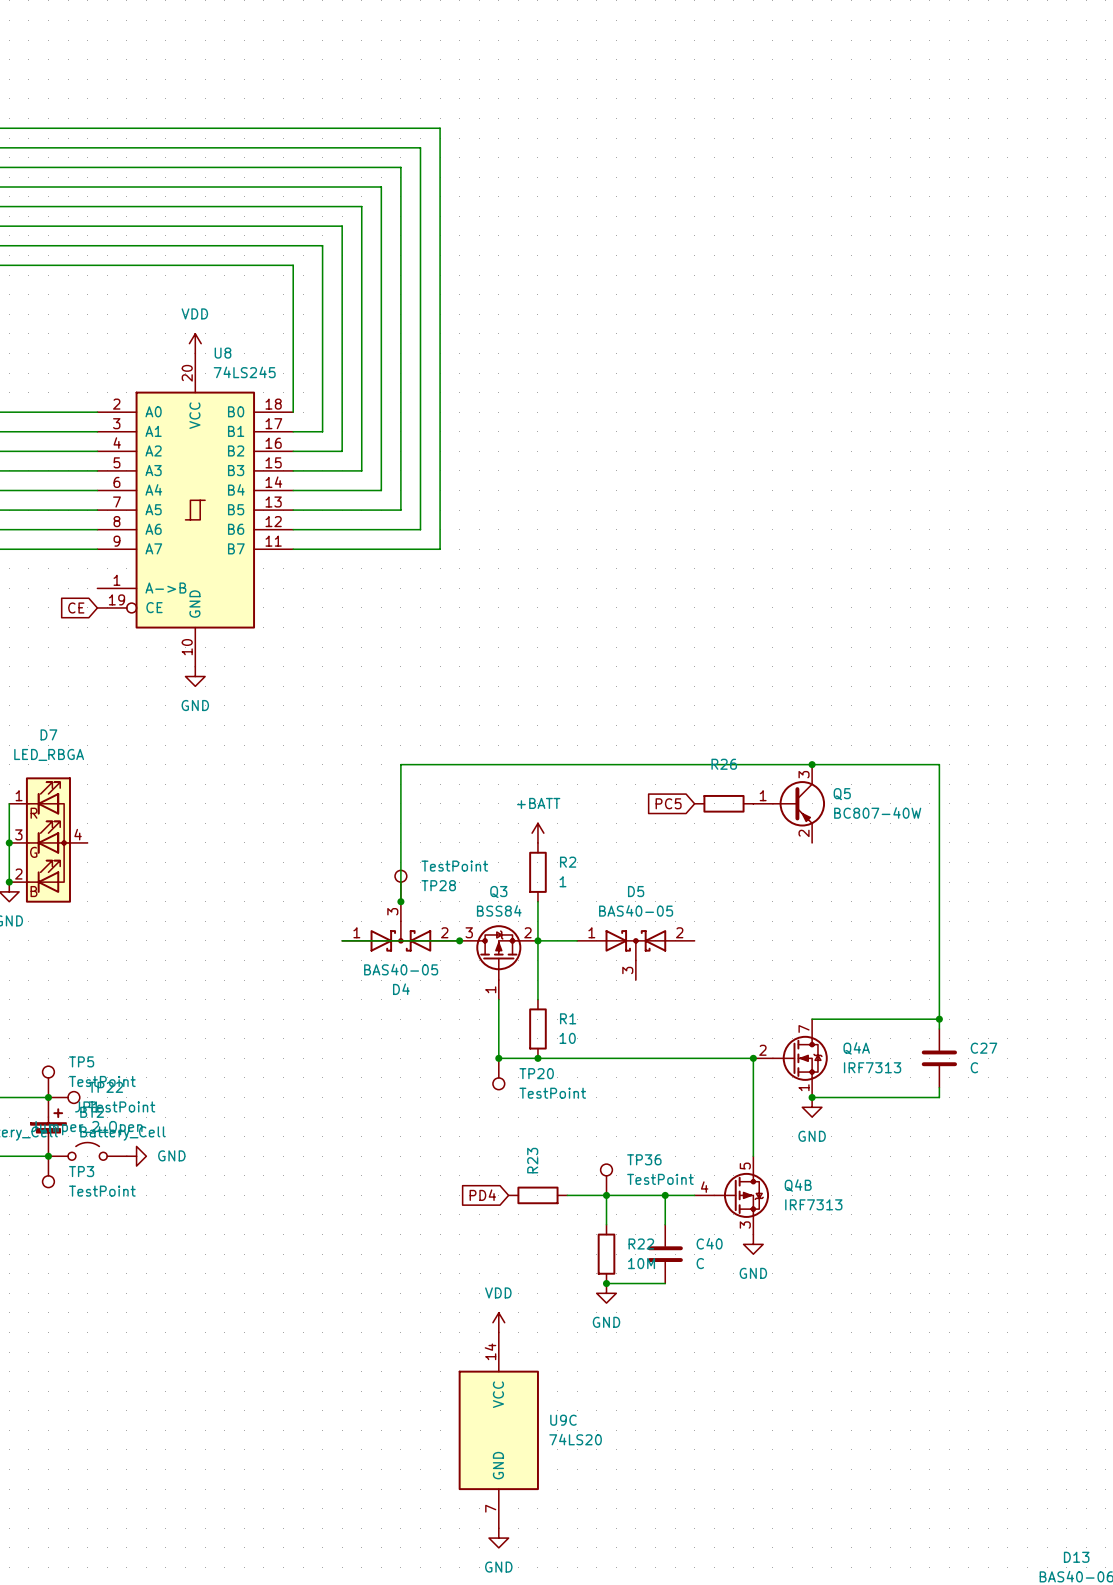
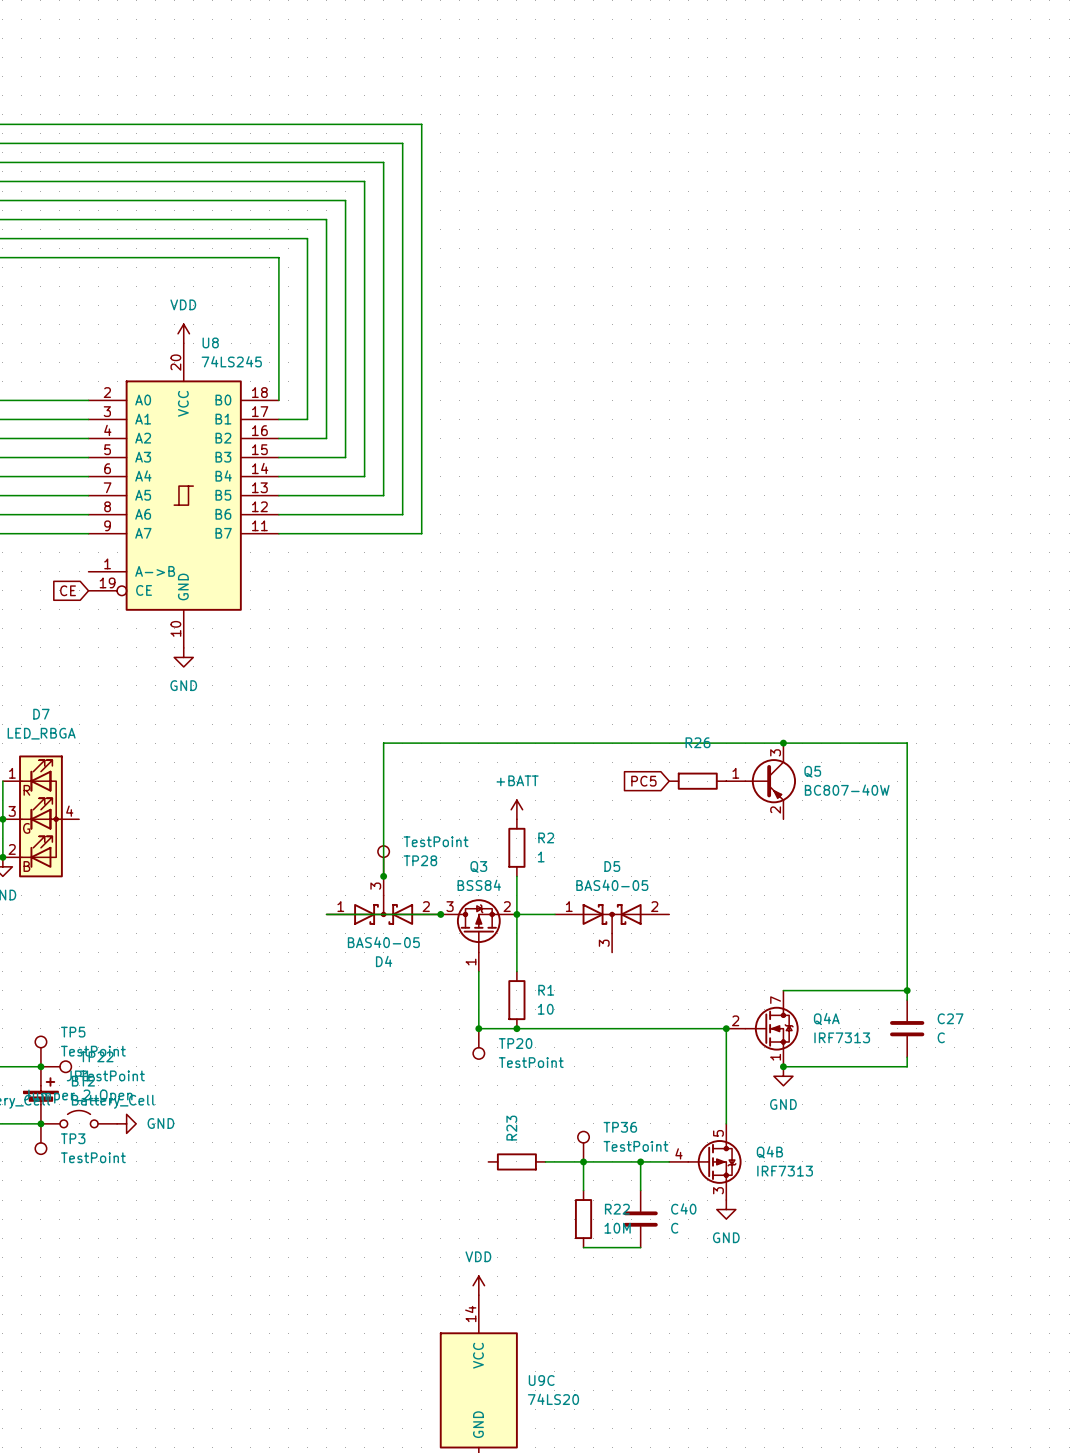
global label: PD4 (482, 1195) -> none
junction: (606, 1283) -> none
power symbol: GND (606, 1293) -> none

